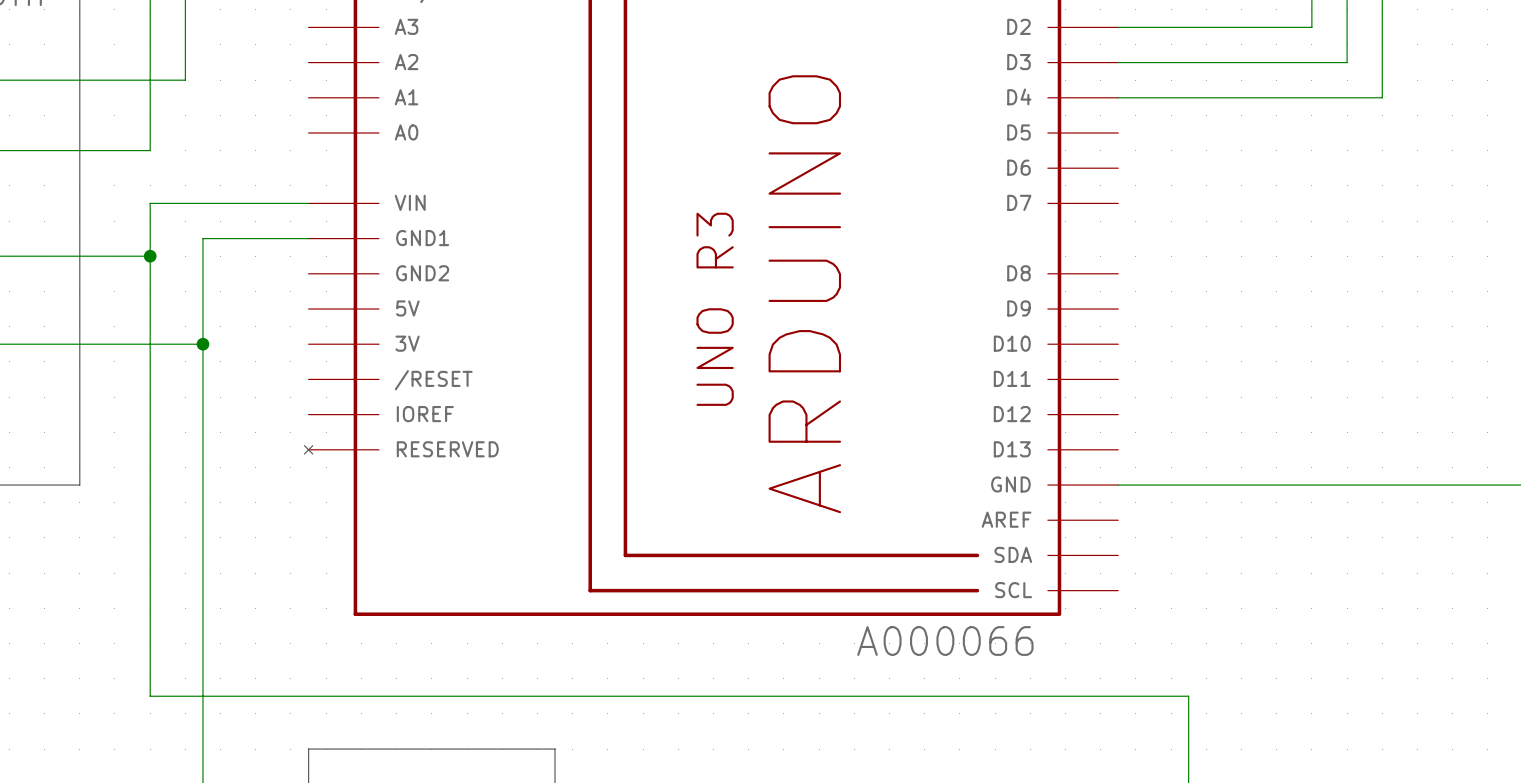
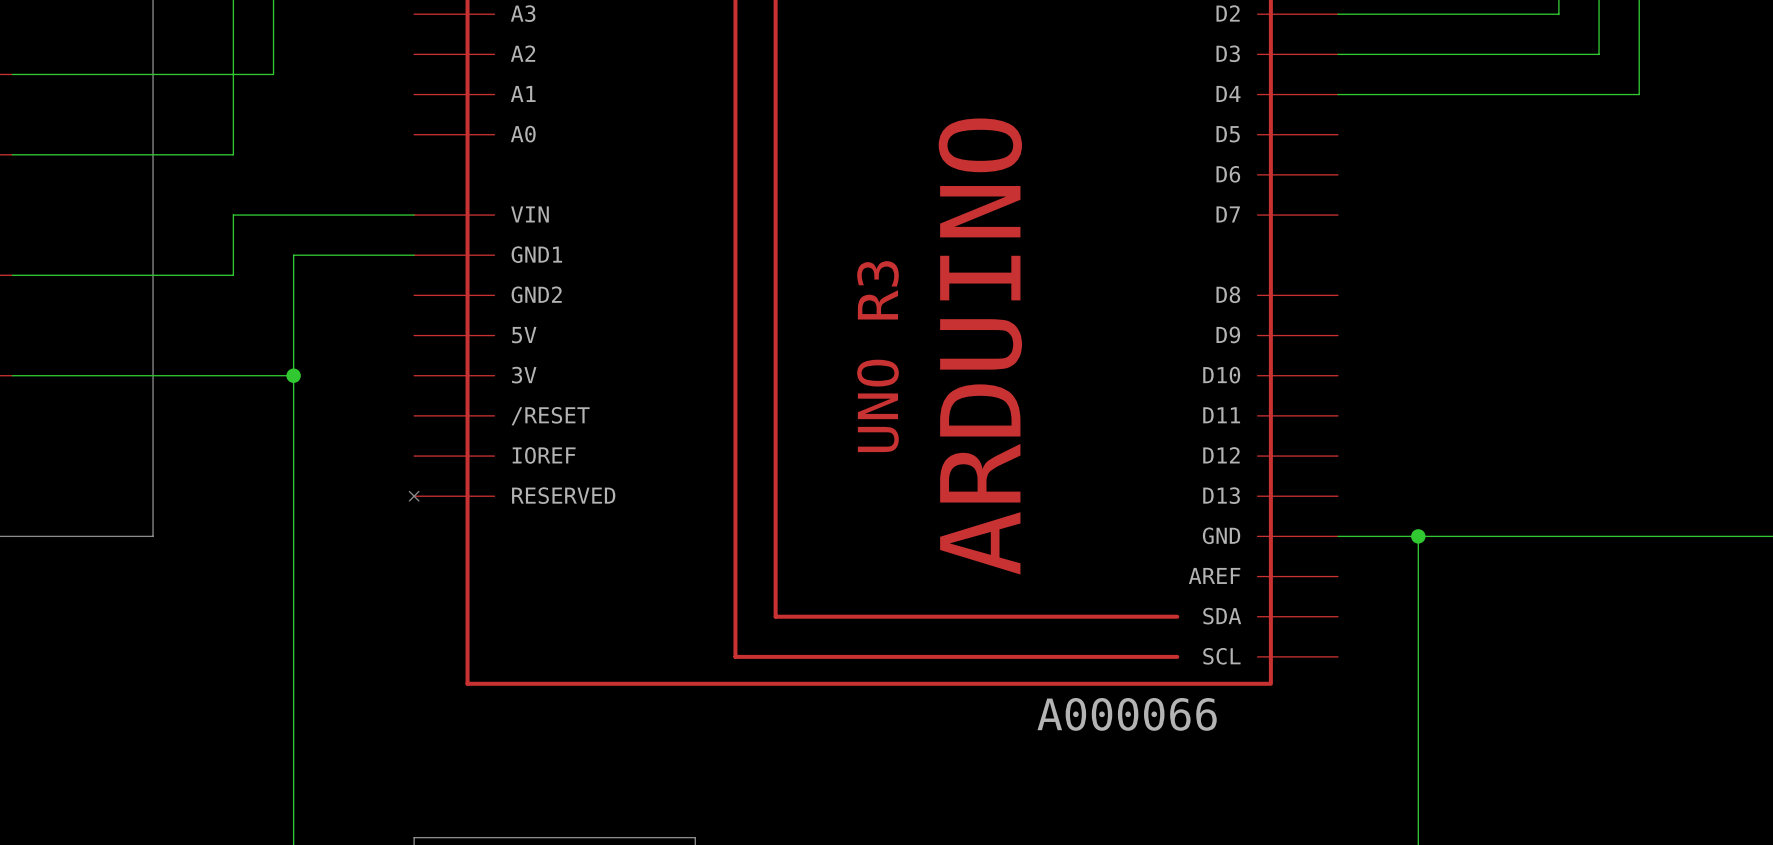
wire: (150, 256) (150, 696) (1188, 696) -> (1418, 536) (1418, 777)
junction: (150, 256) -> none
junction: none -> (1418, 536)

